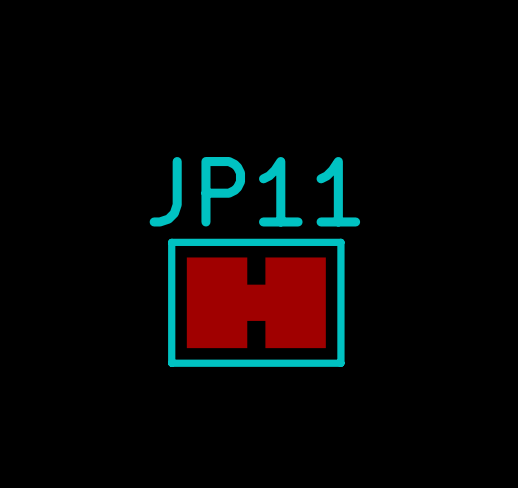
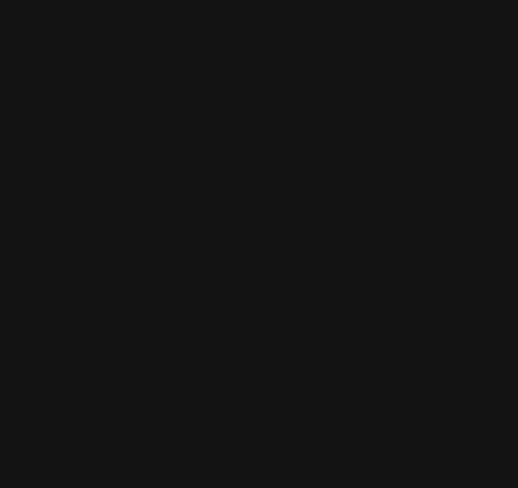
JP11: (256, 302) -> none

